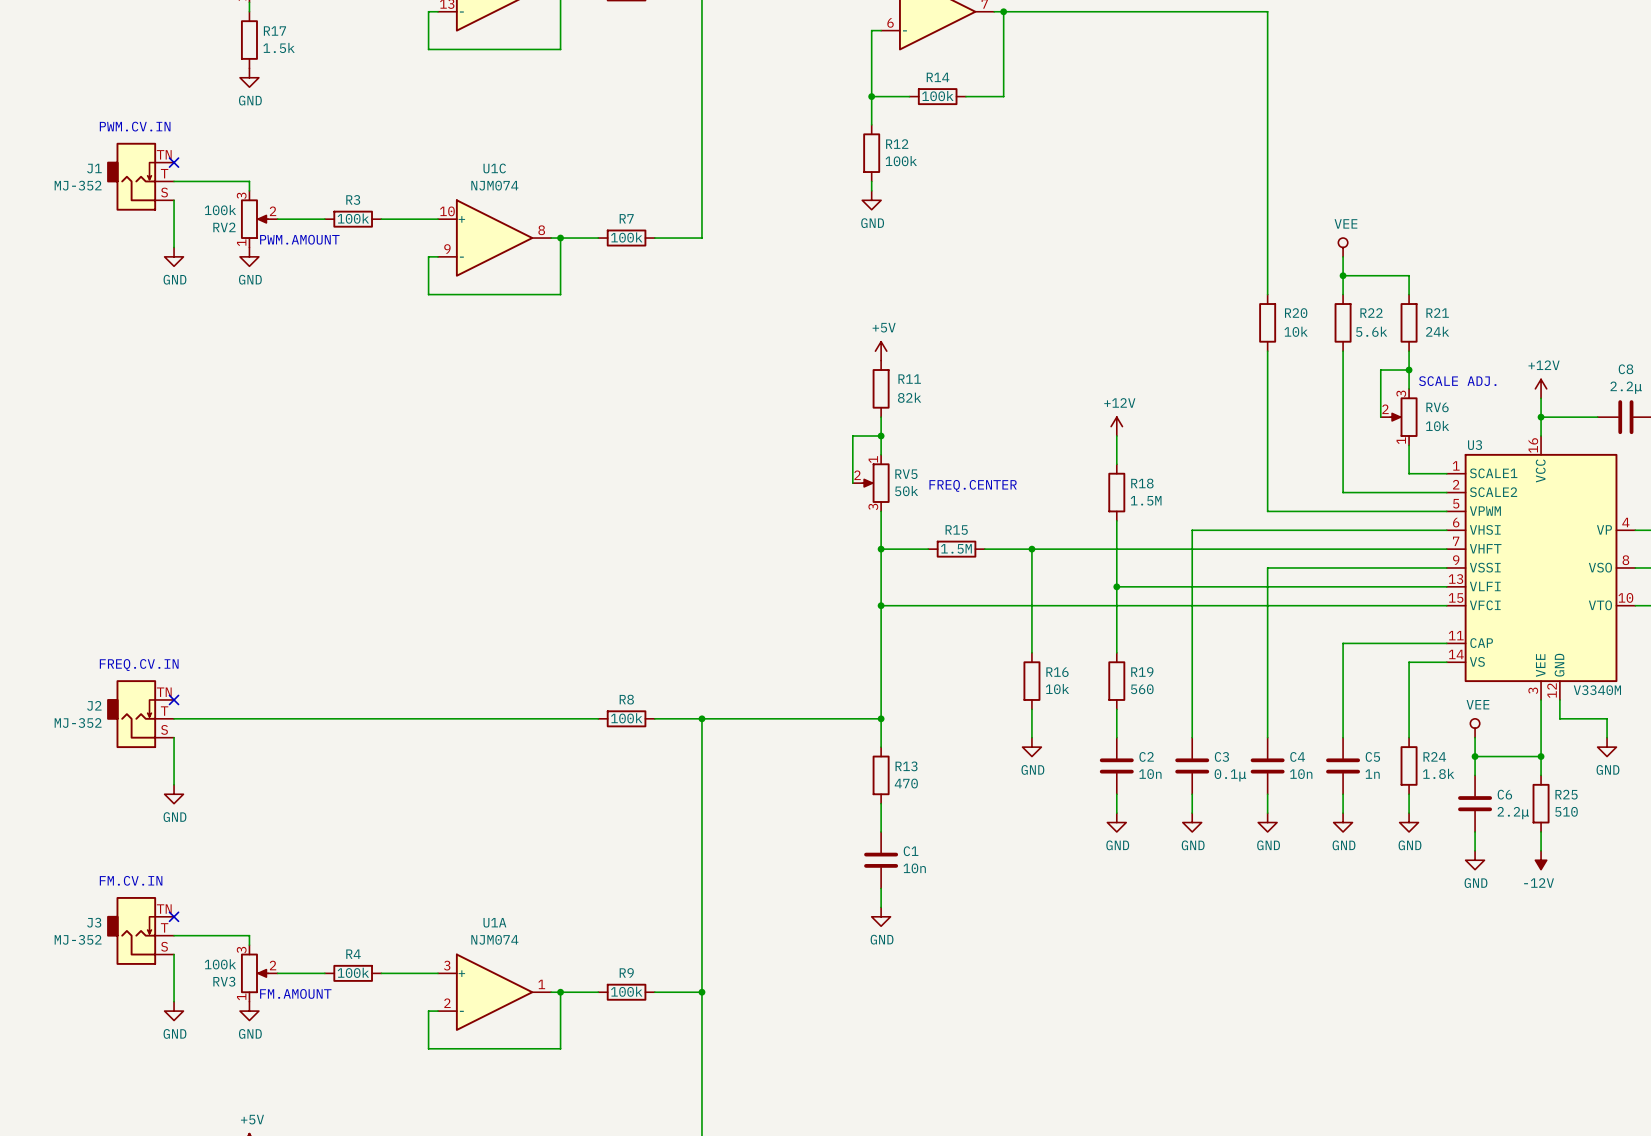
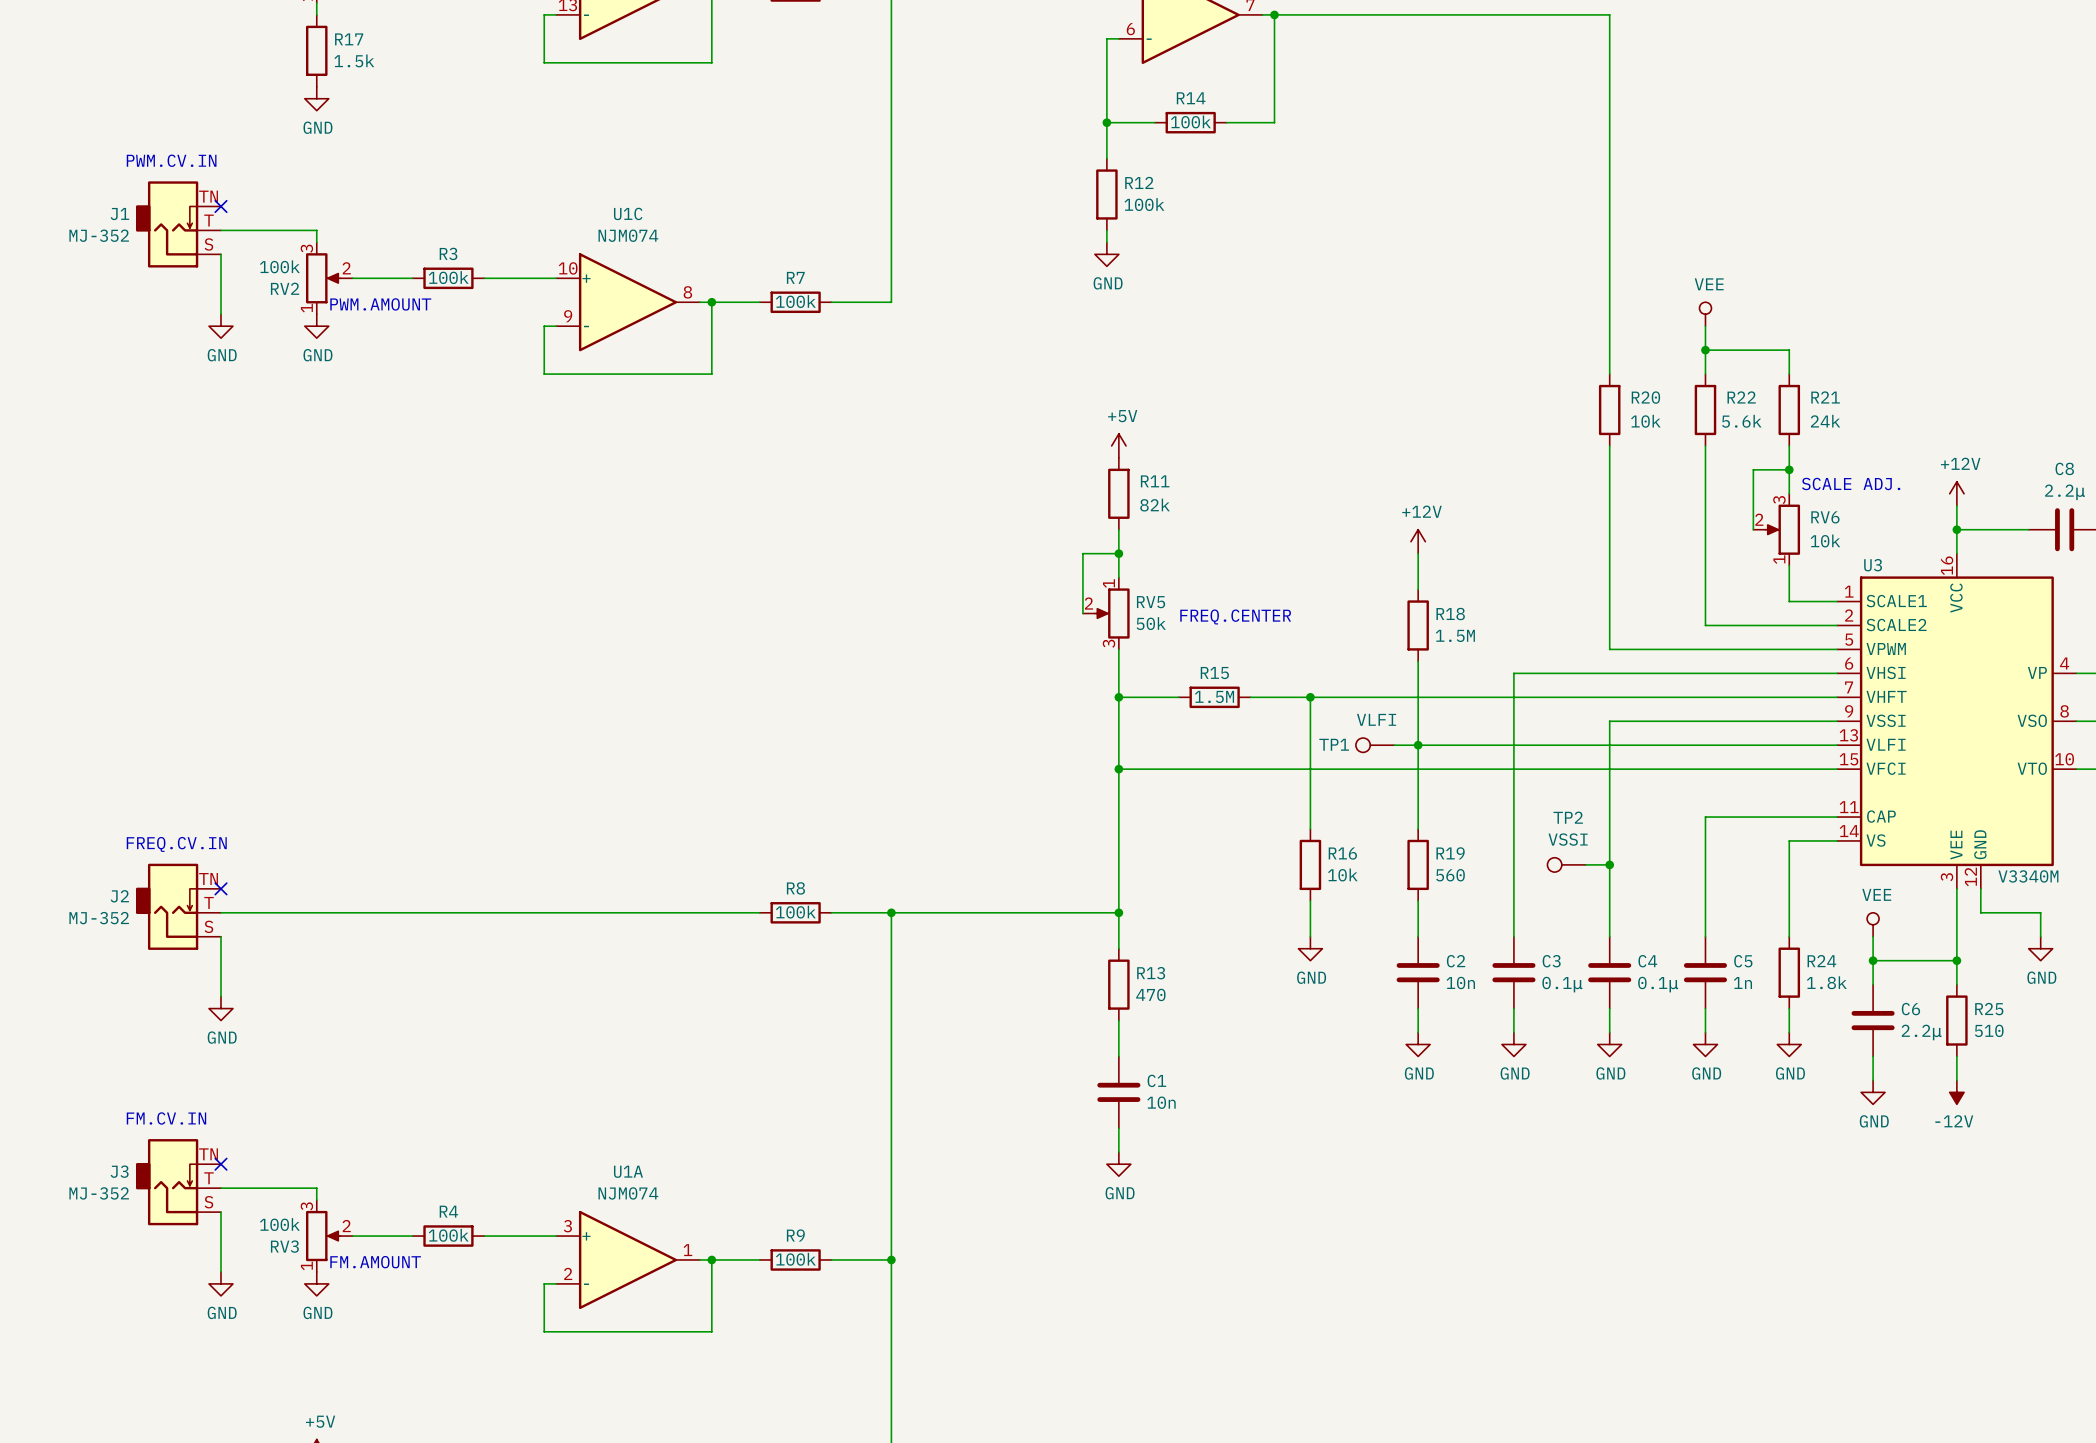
TP1: none -> VLFI (1375, 745)
wire: none -> (1394, 745) (1418, 745)
TP2: none -> VSSI (1566, 864)
wire: none -> (1585, 864) (1609, 864)
junction: none -> (1609, 864)
C4 value: 10n (1301, 774) -> 0.1μ (1658, 984)

